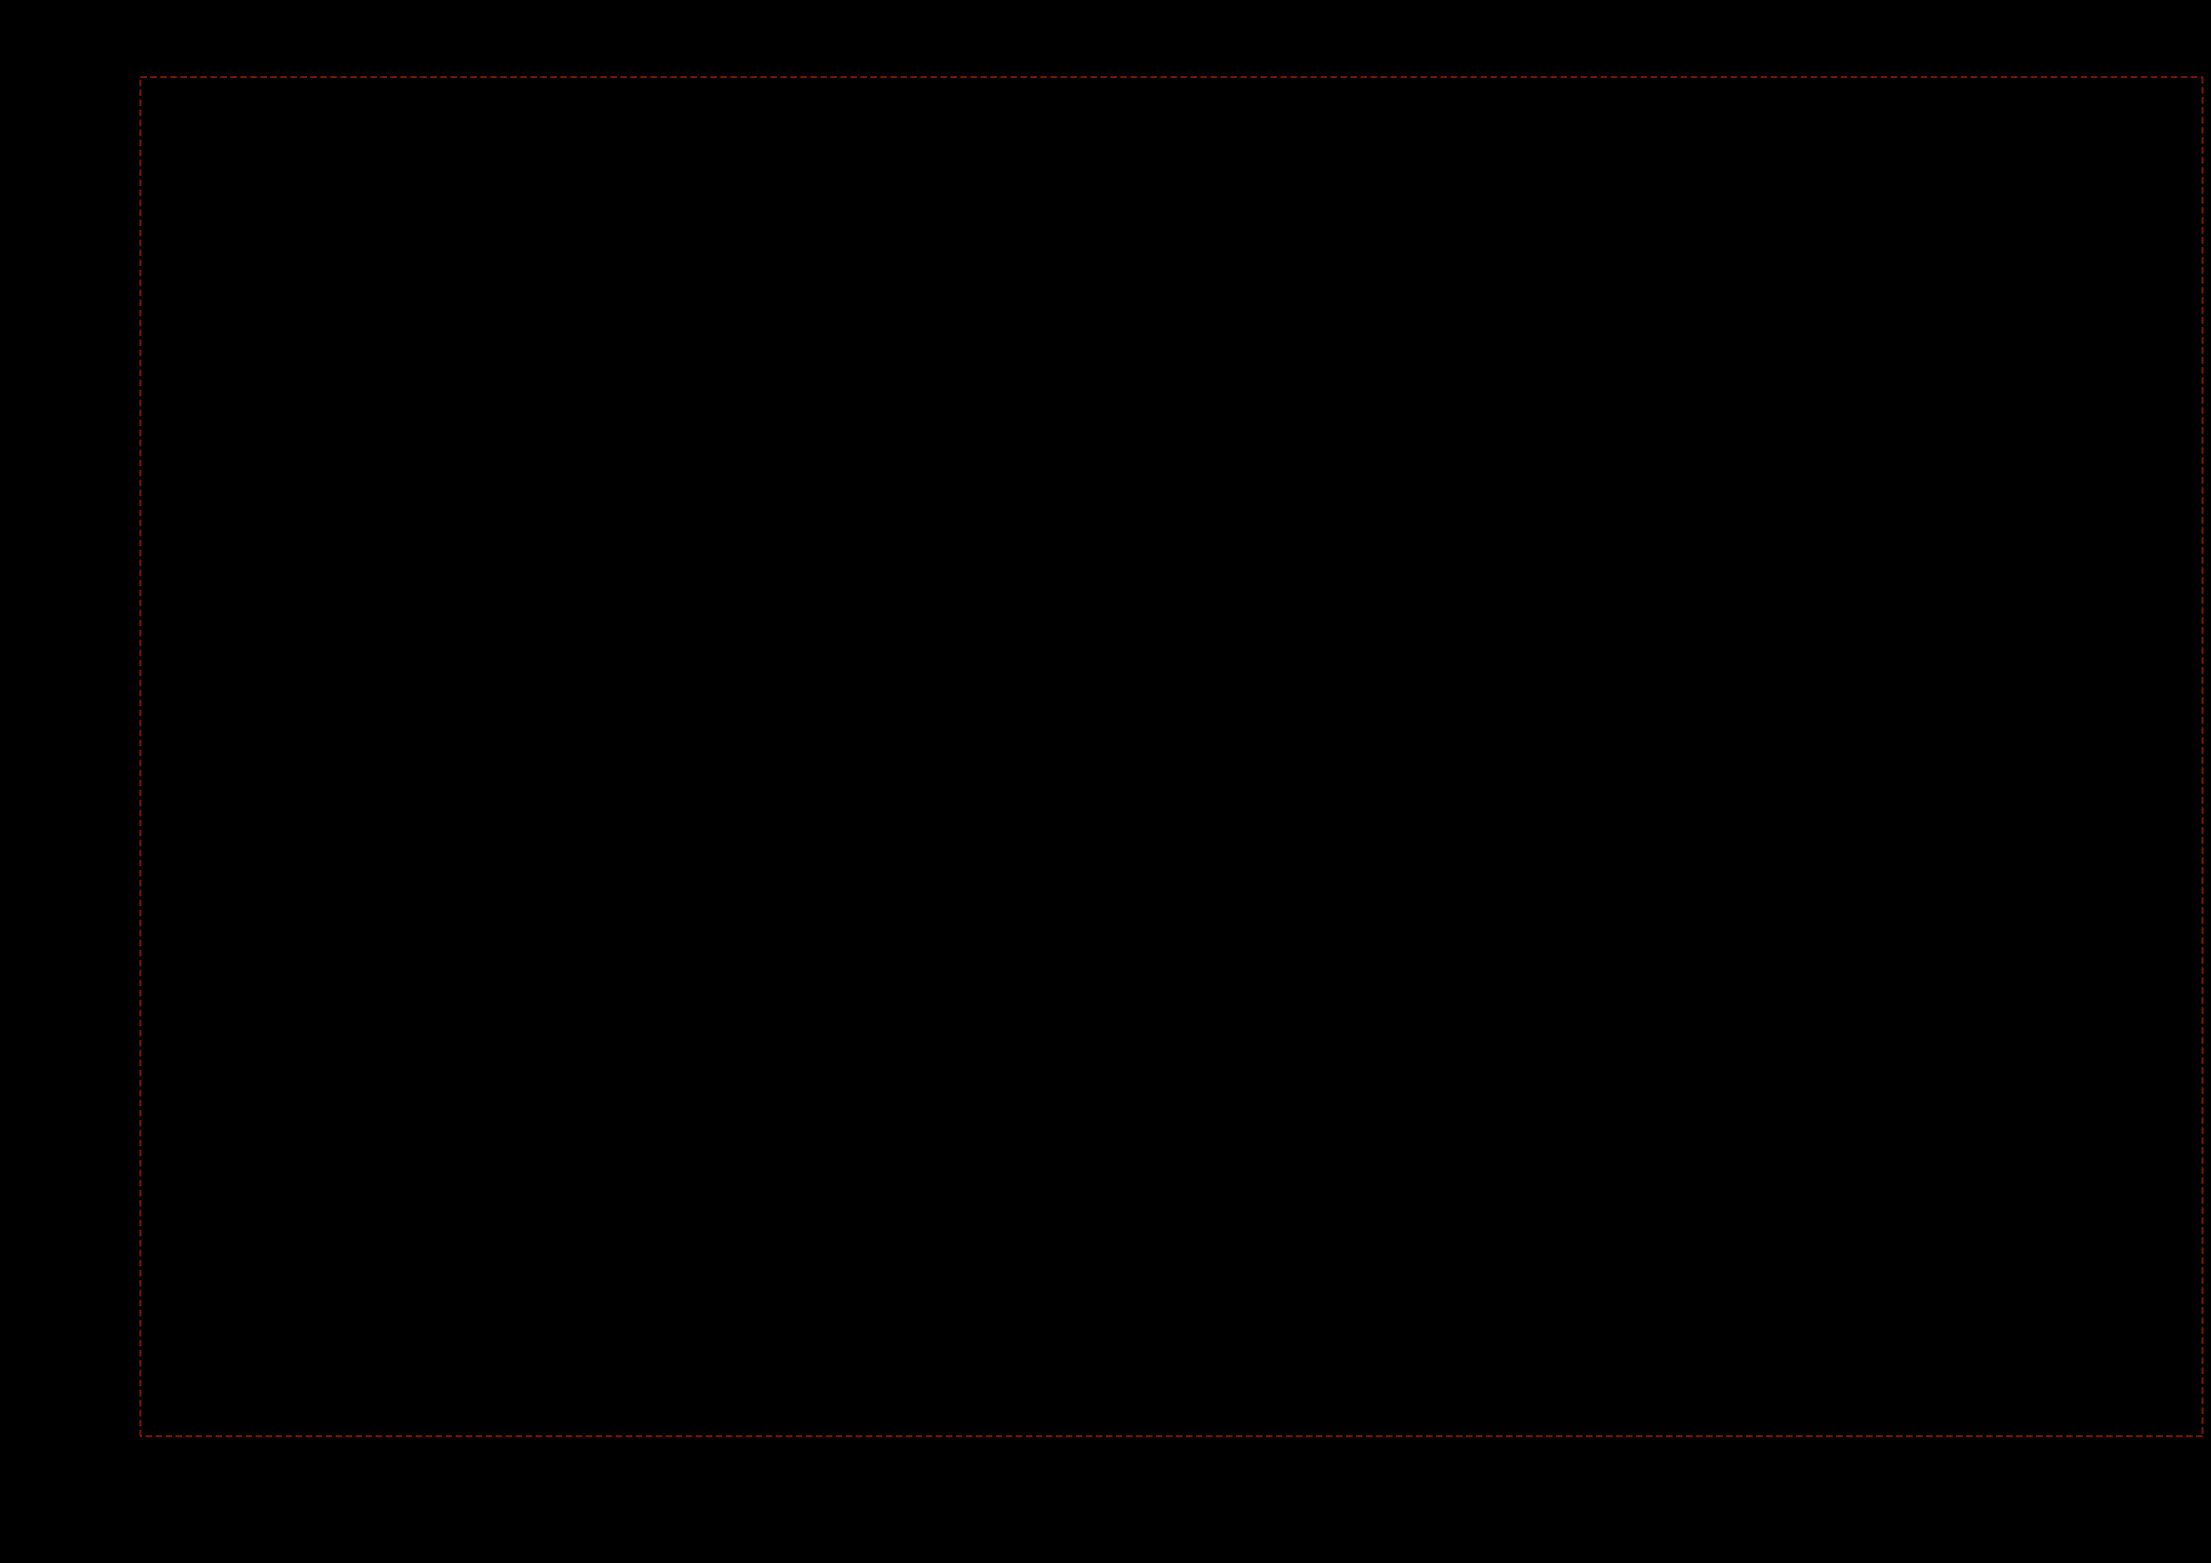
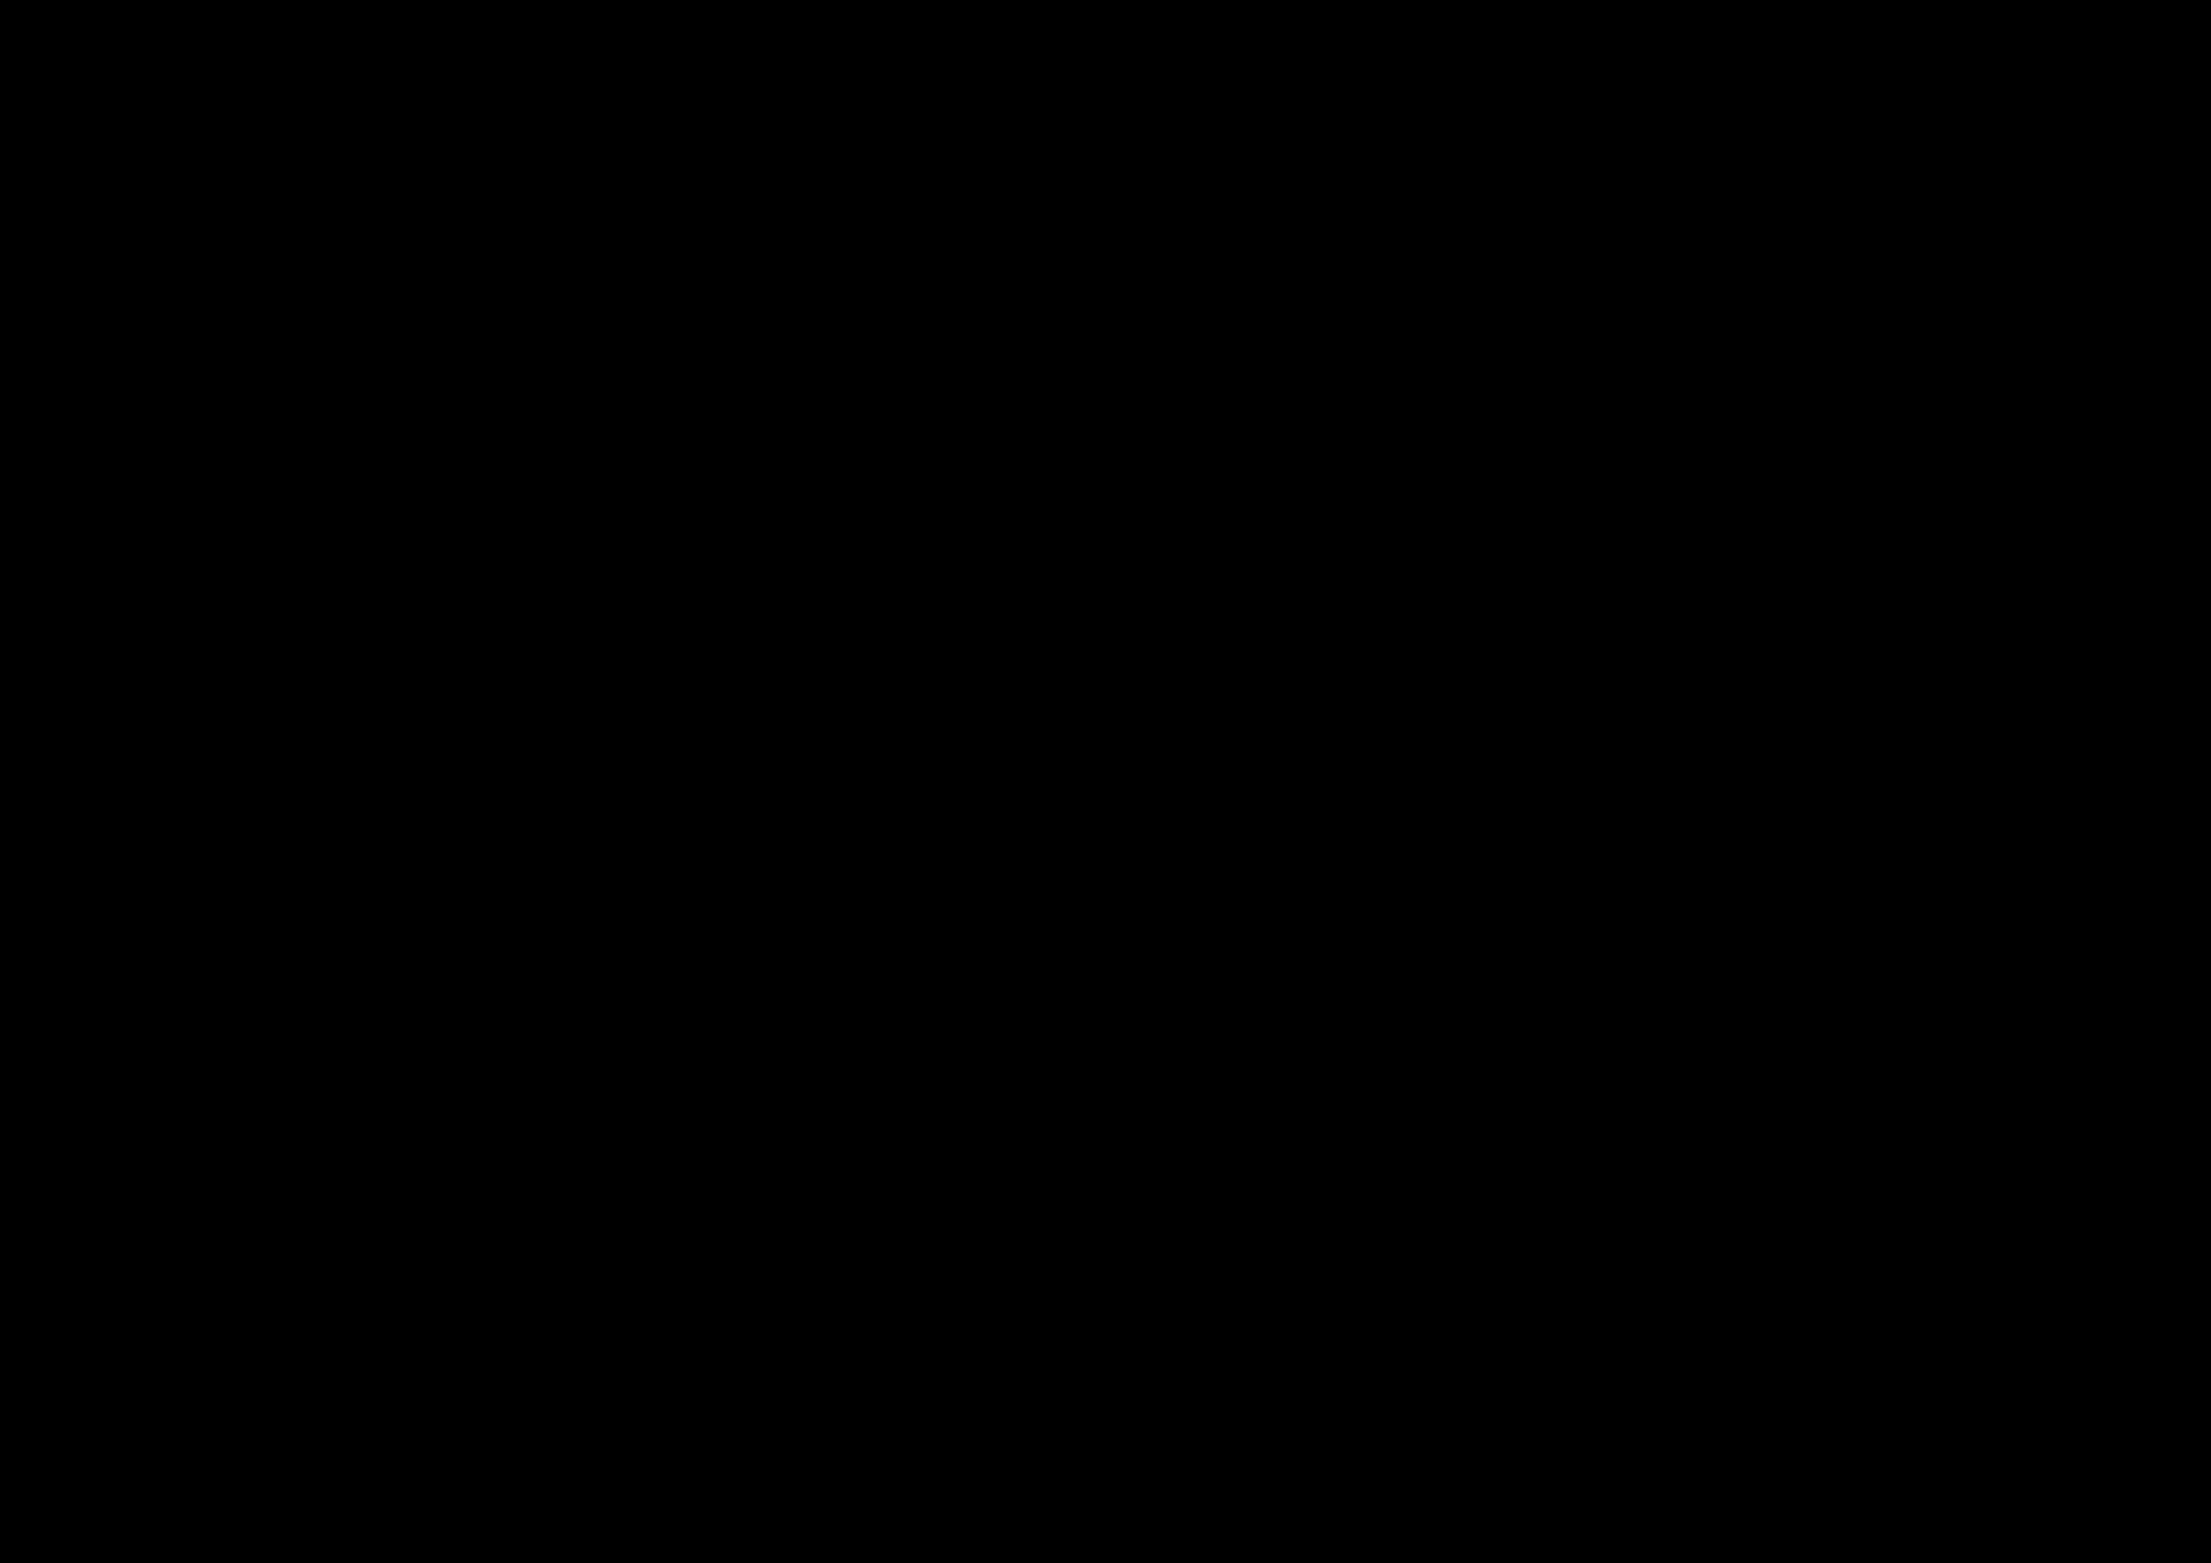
top zone outline: (140, 77) (2202, 77) (2202, 1436) (140, 1436) (140, 77) -> none

